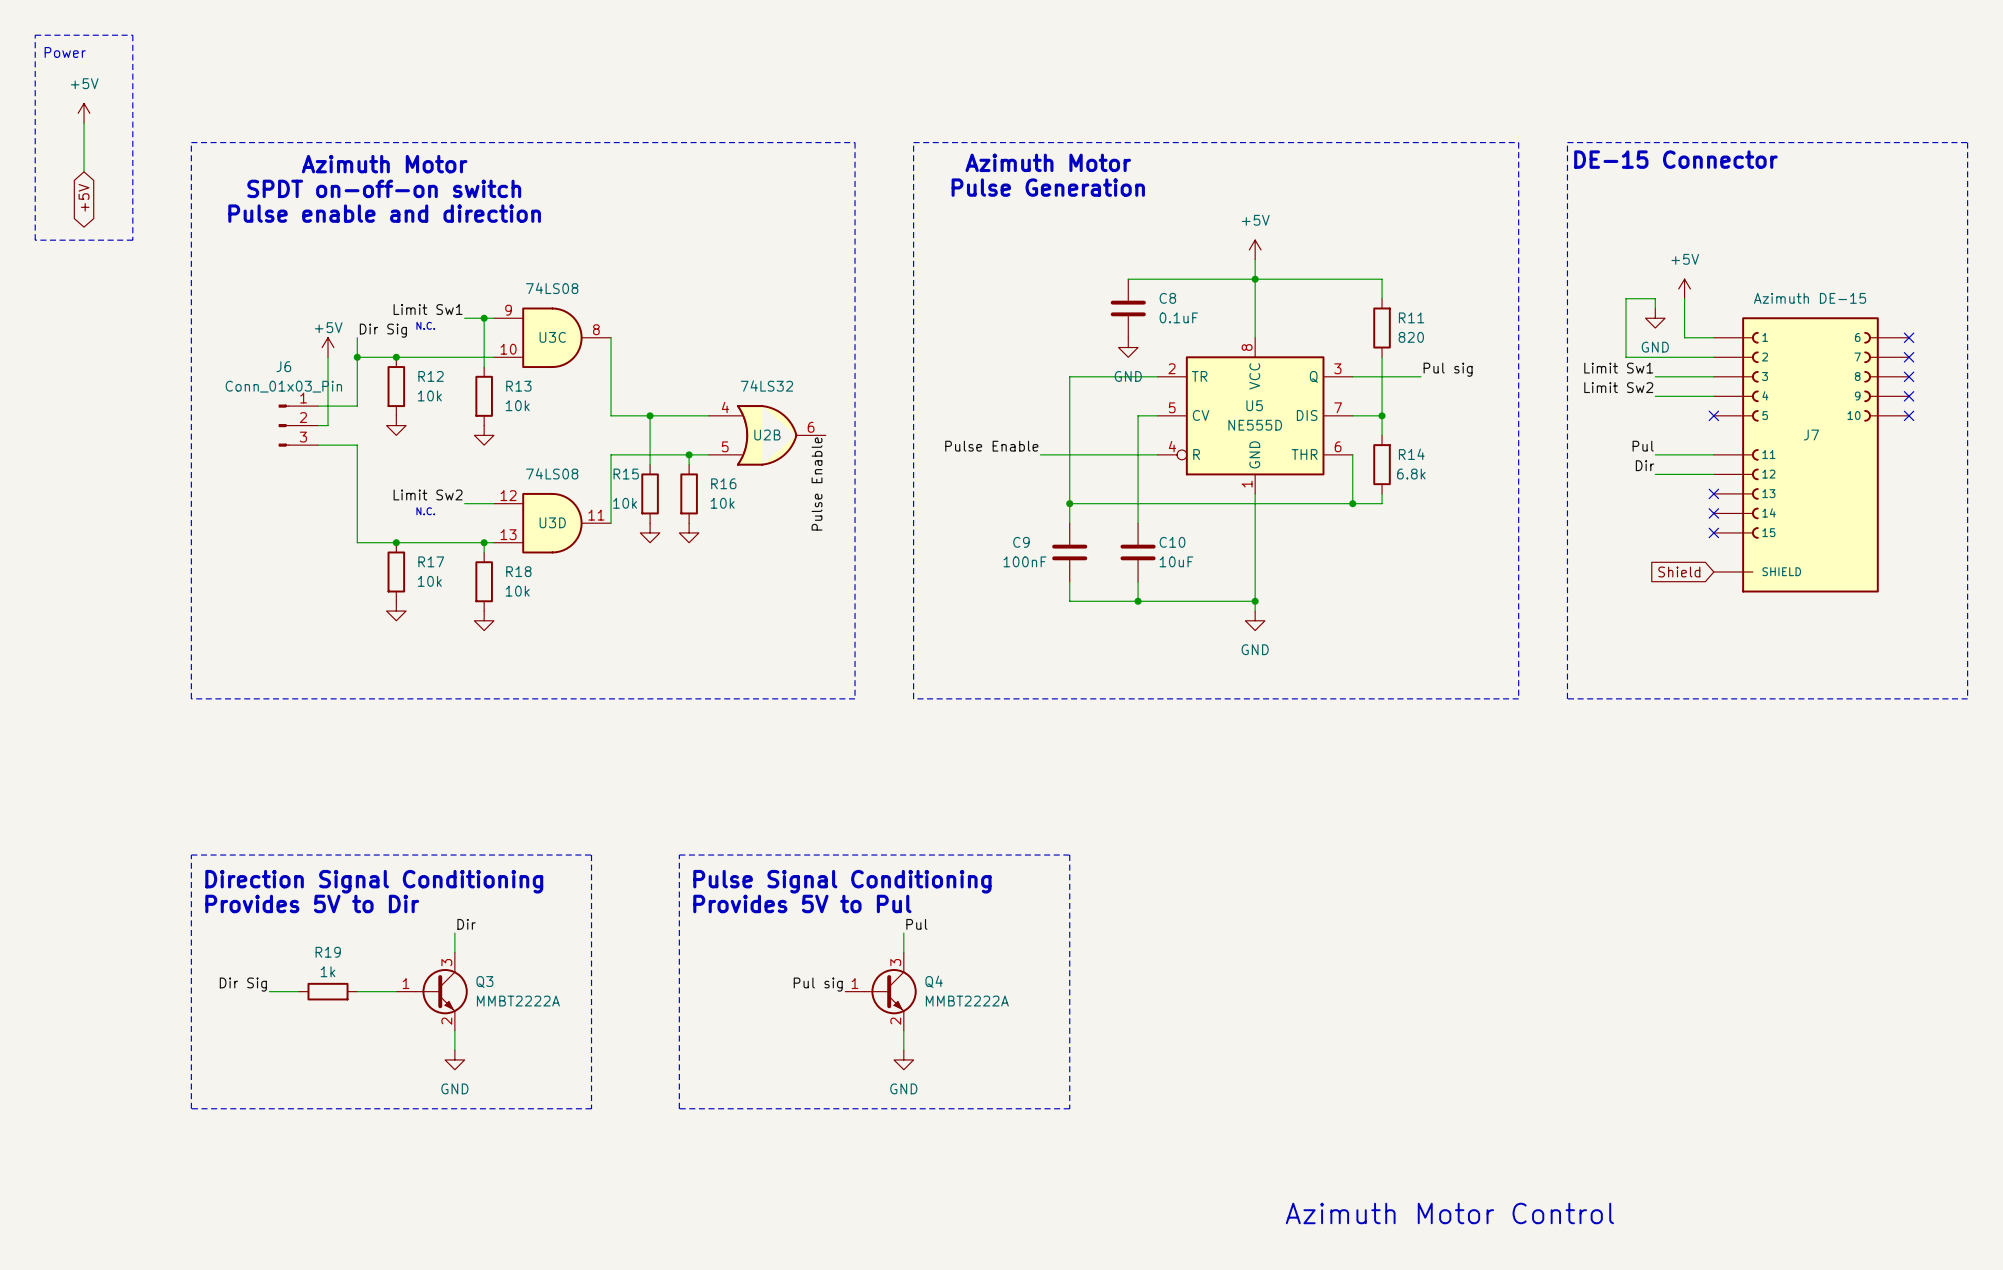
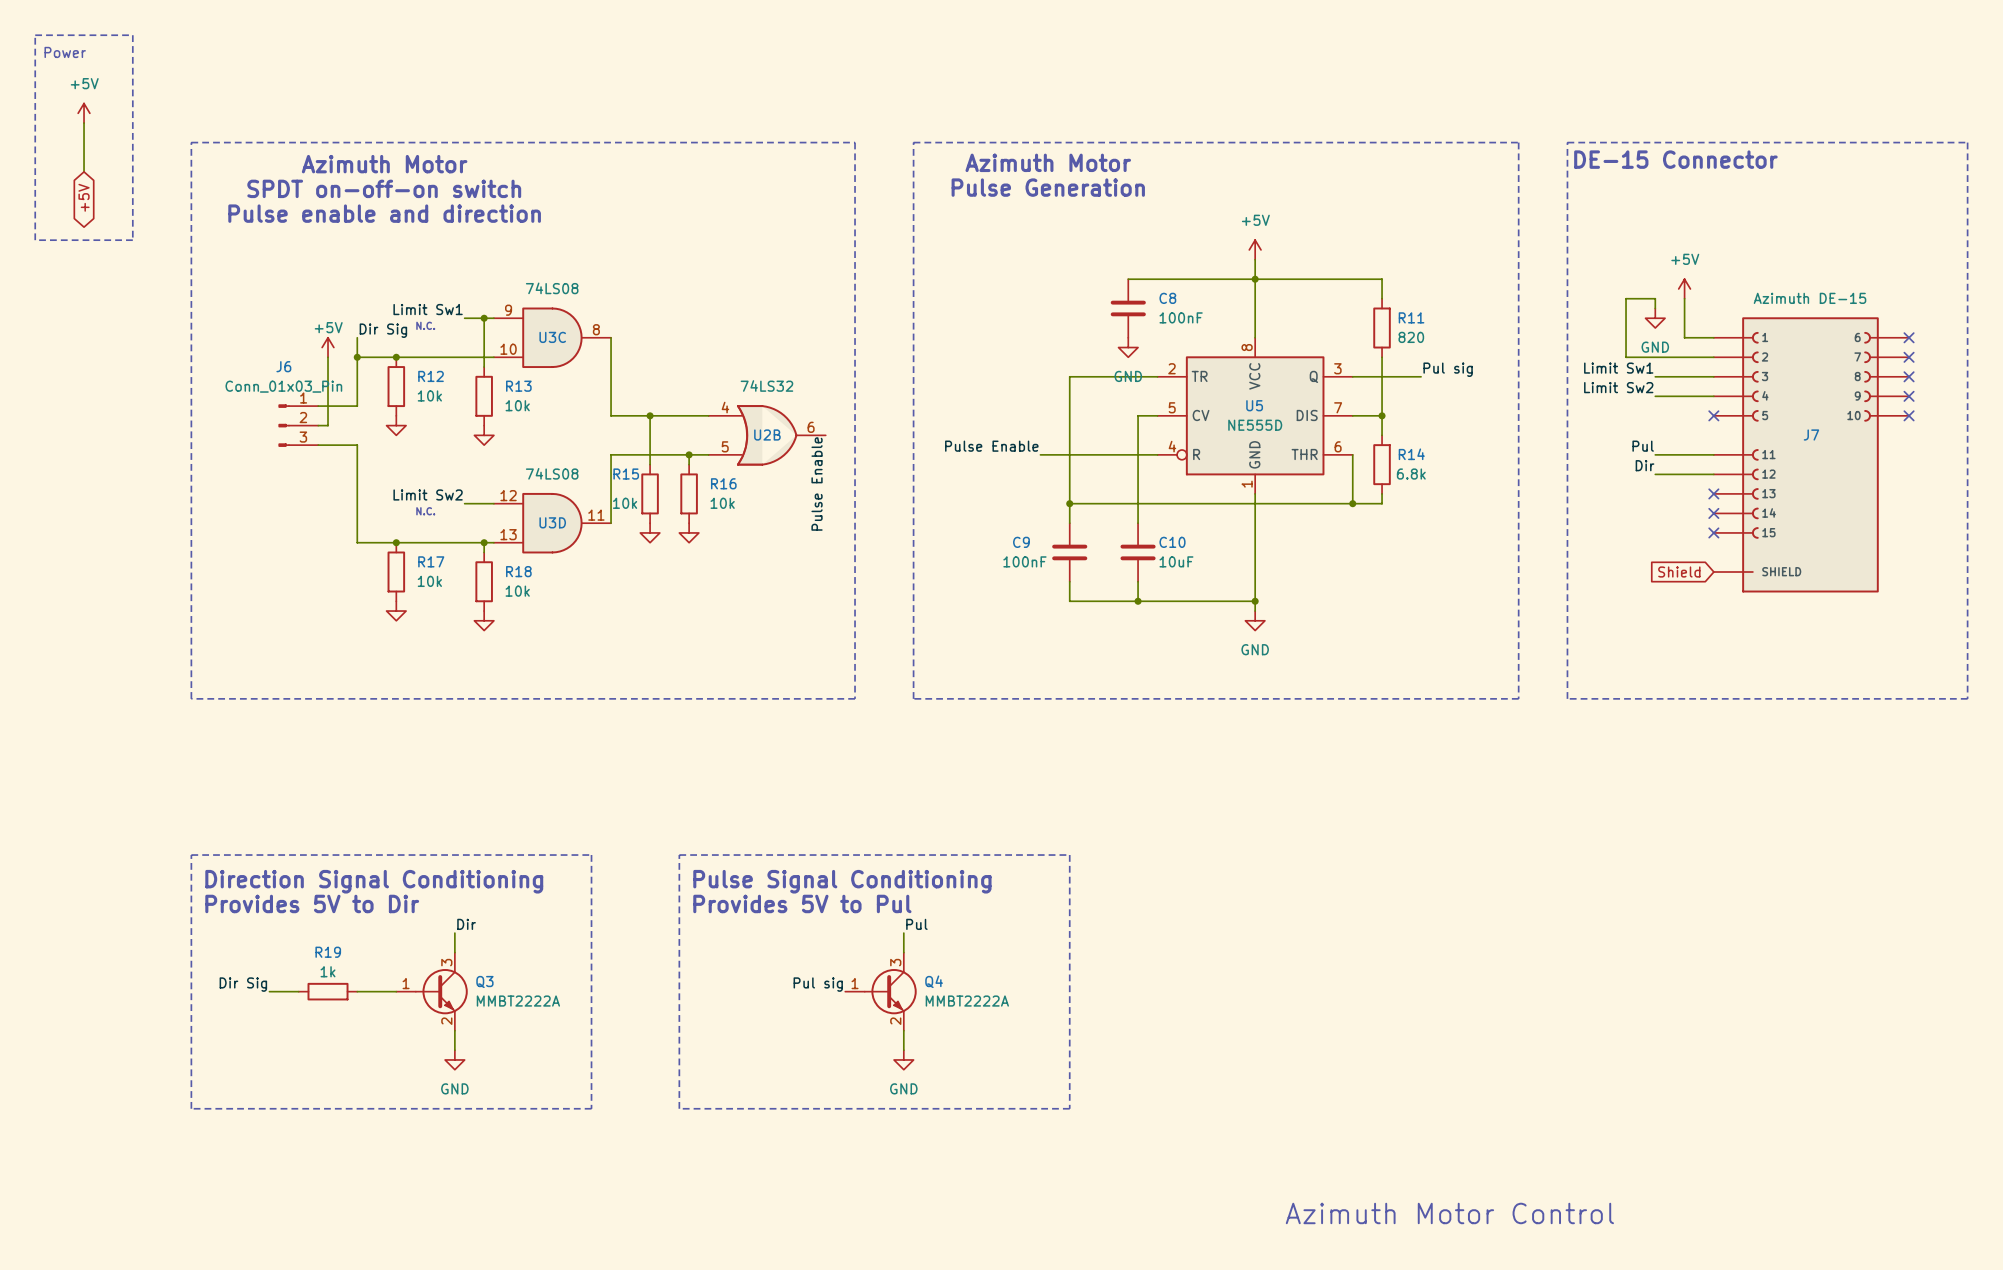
C8 value: 0.1uF (1178, 317) -> 100nF (1181, 317)

